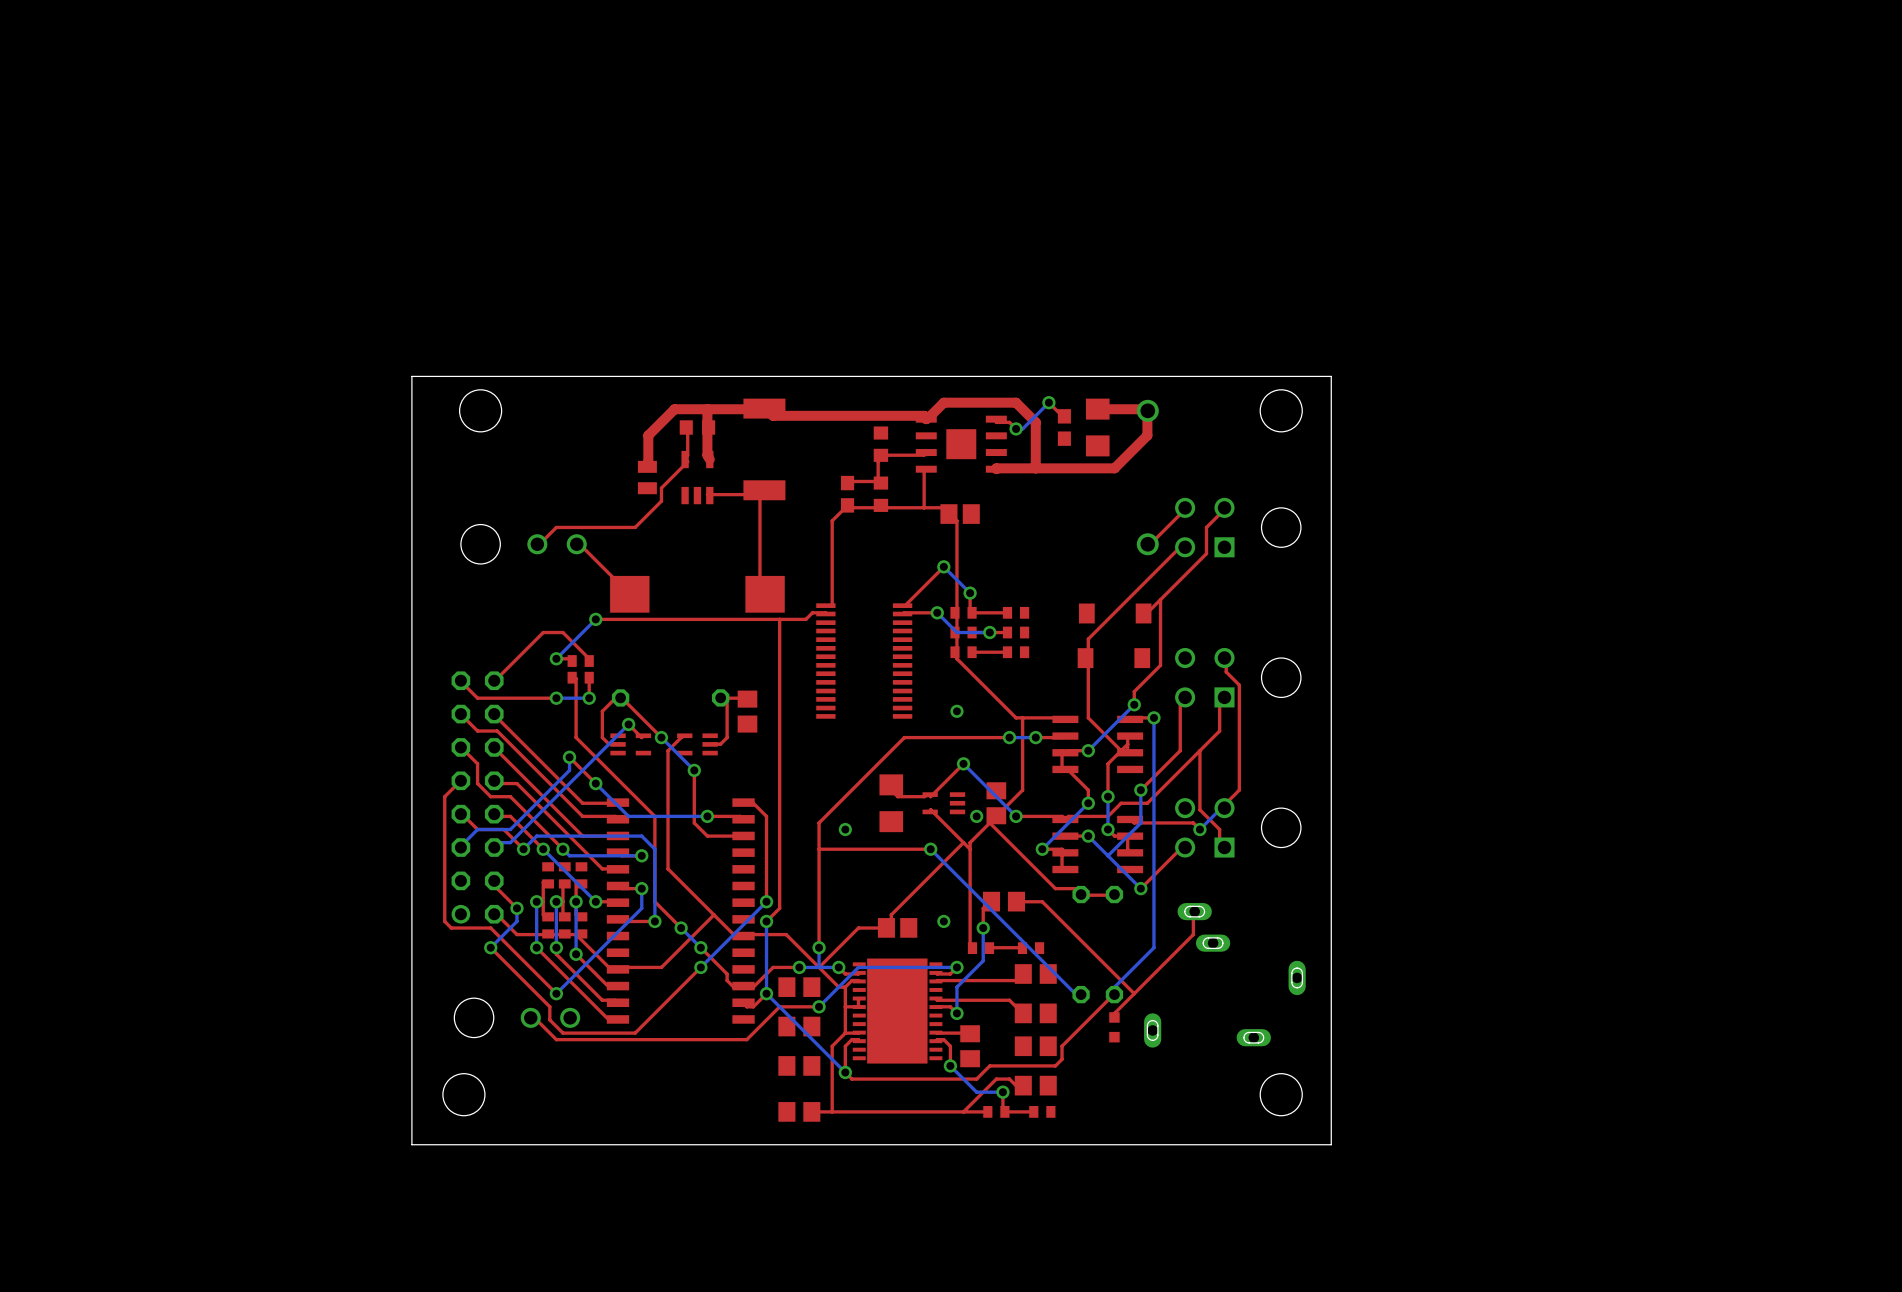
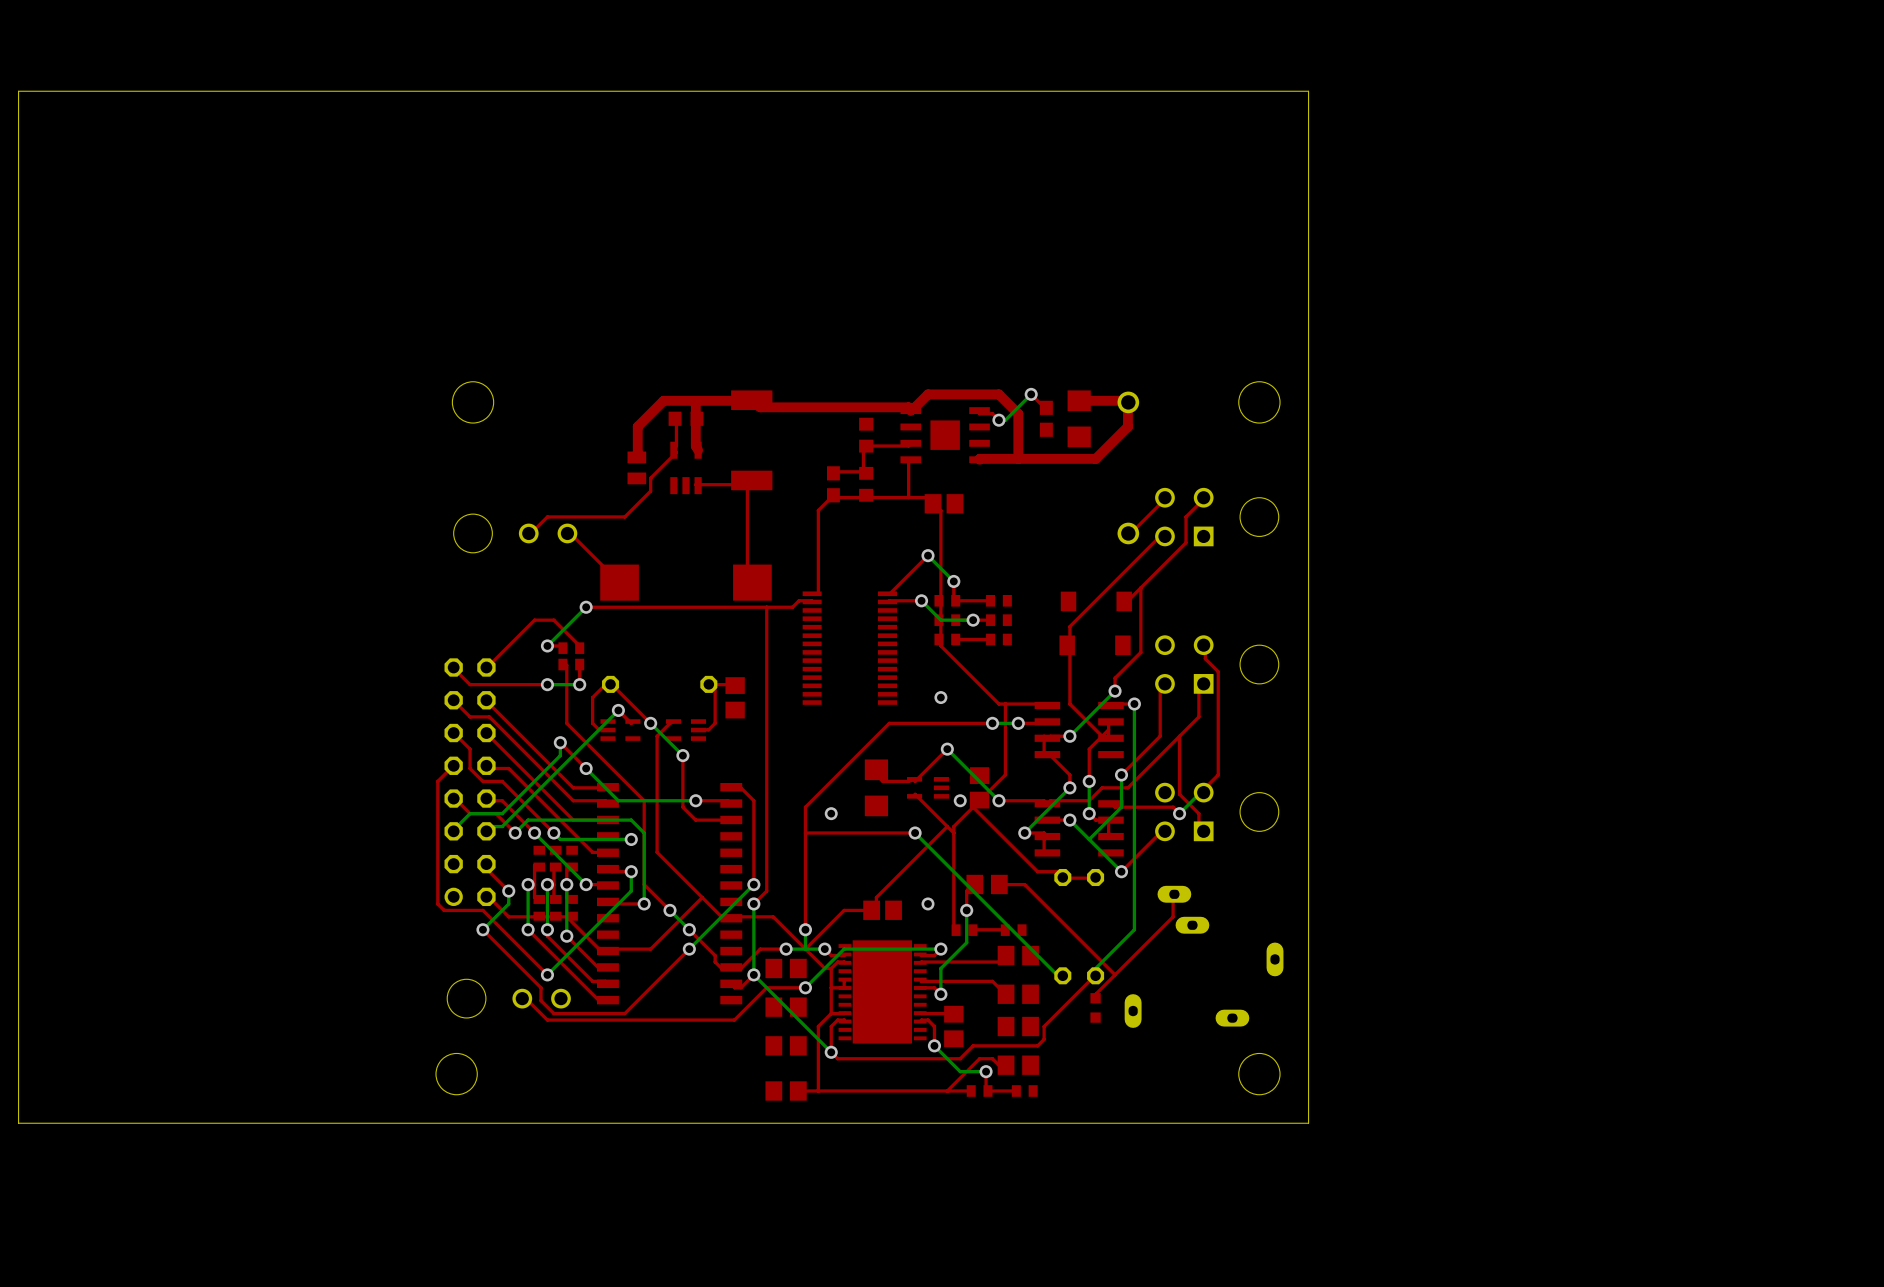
board edge: (1331, 376) (411, 376) (411, 1144) -> (1308, 368) (1308, 91) (18, 91) (18, 1123) (405, 1123)

